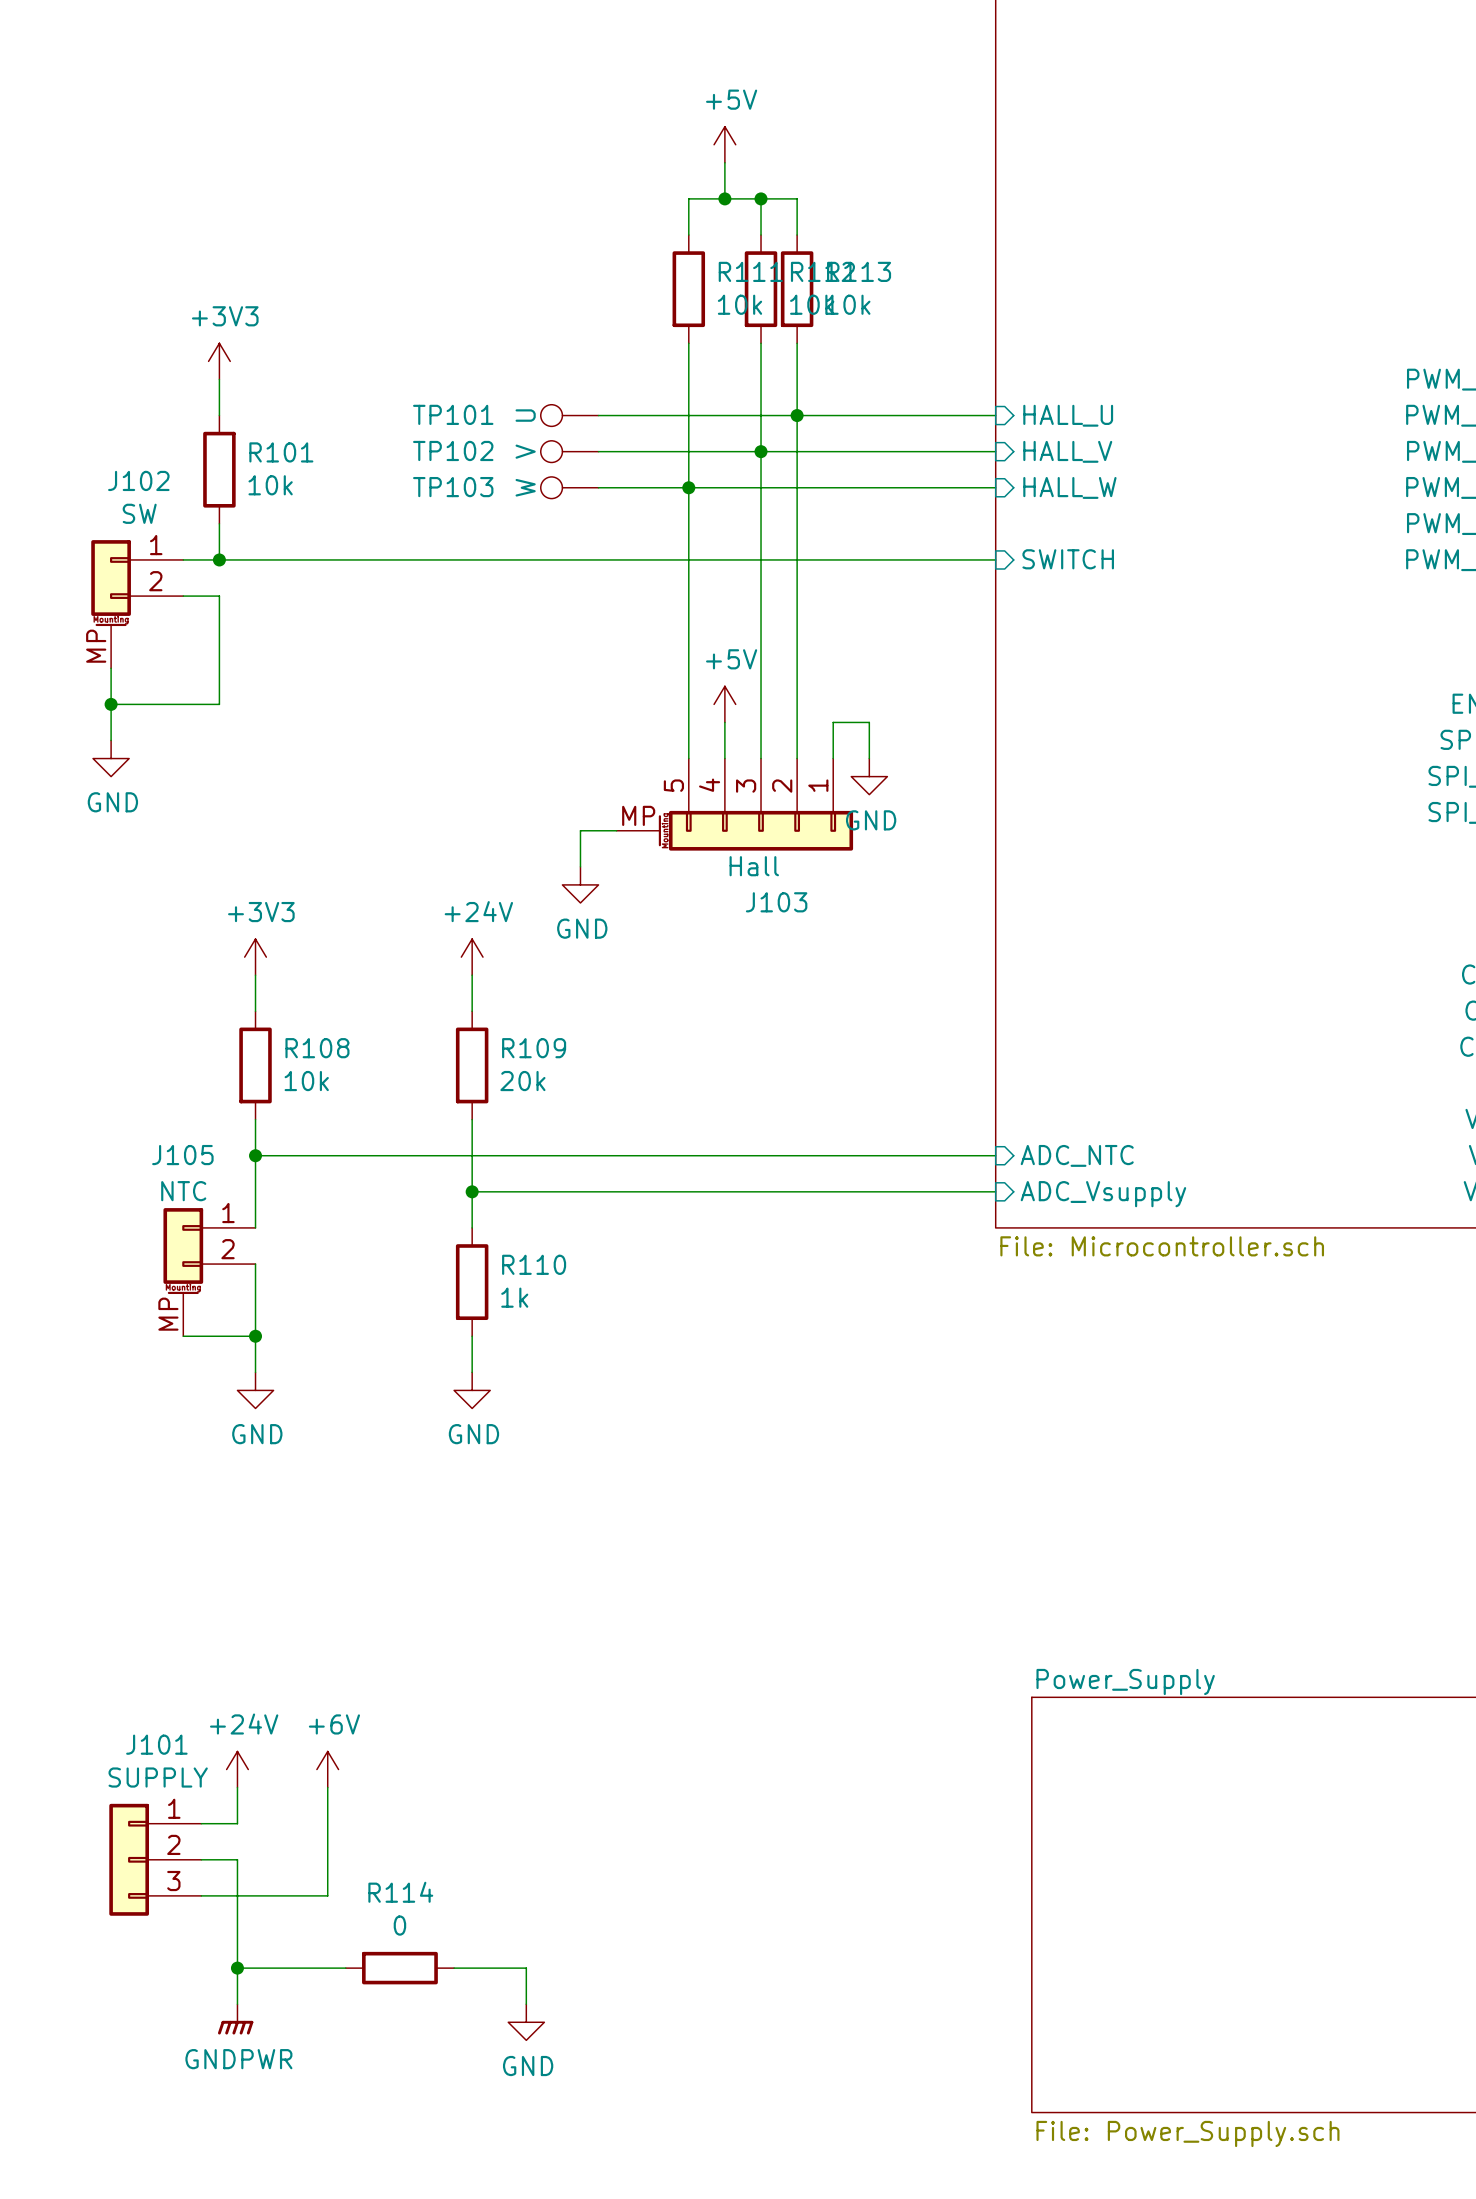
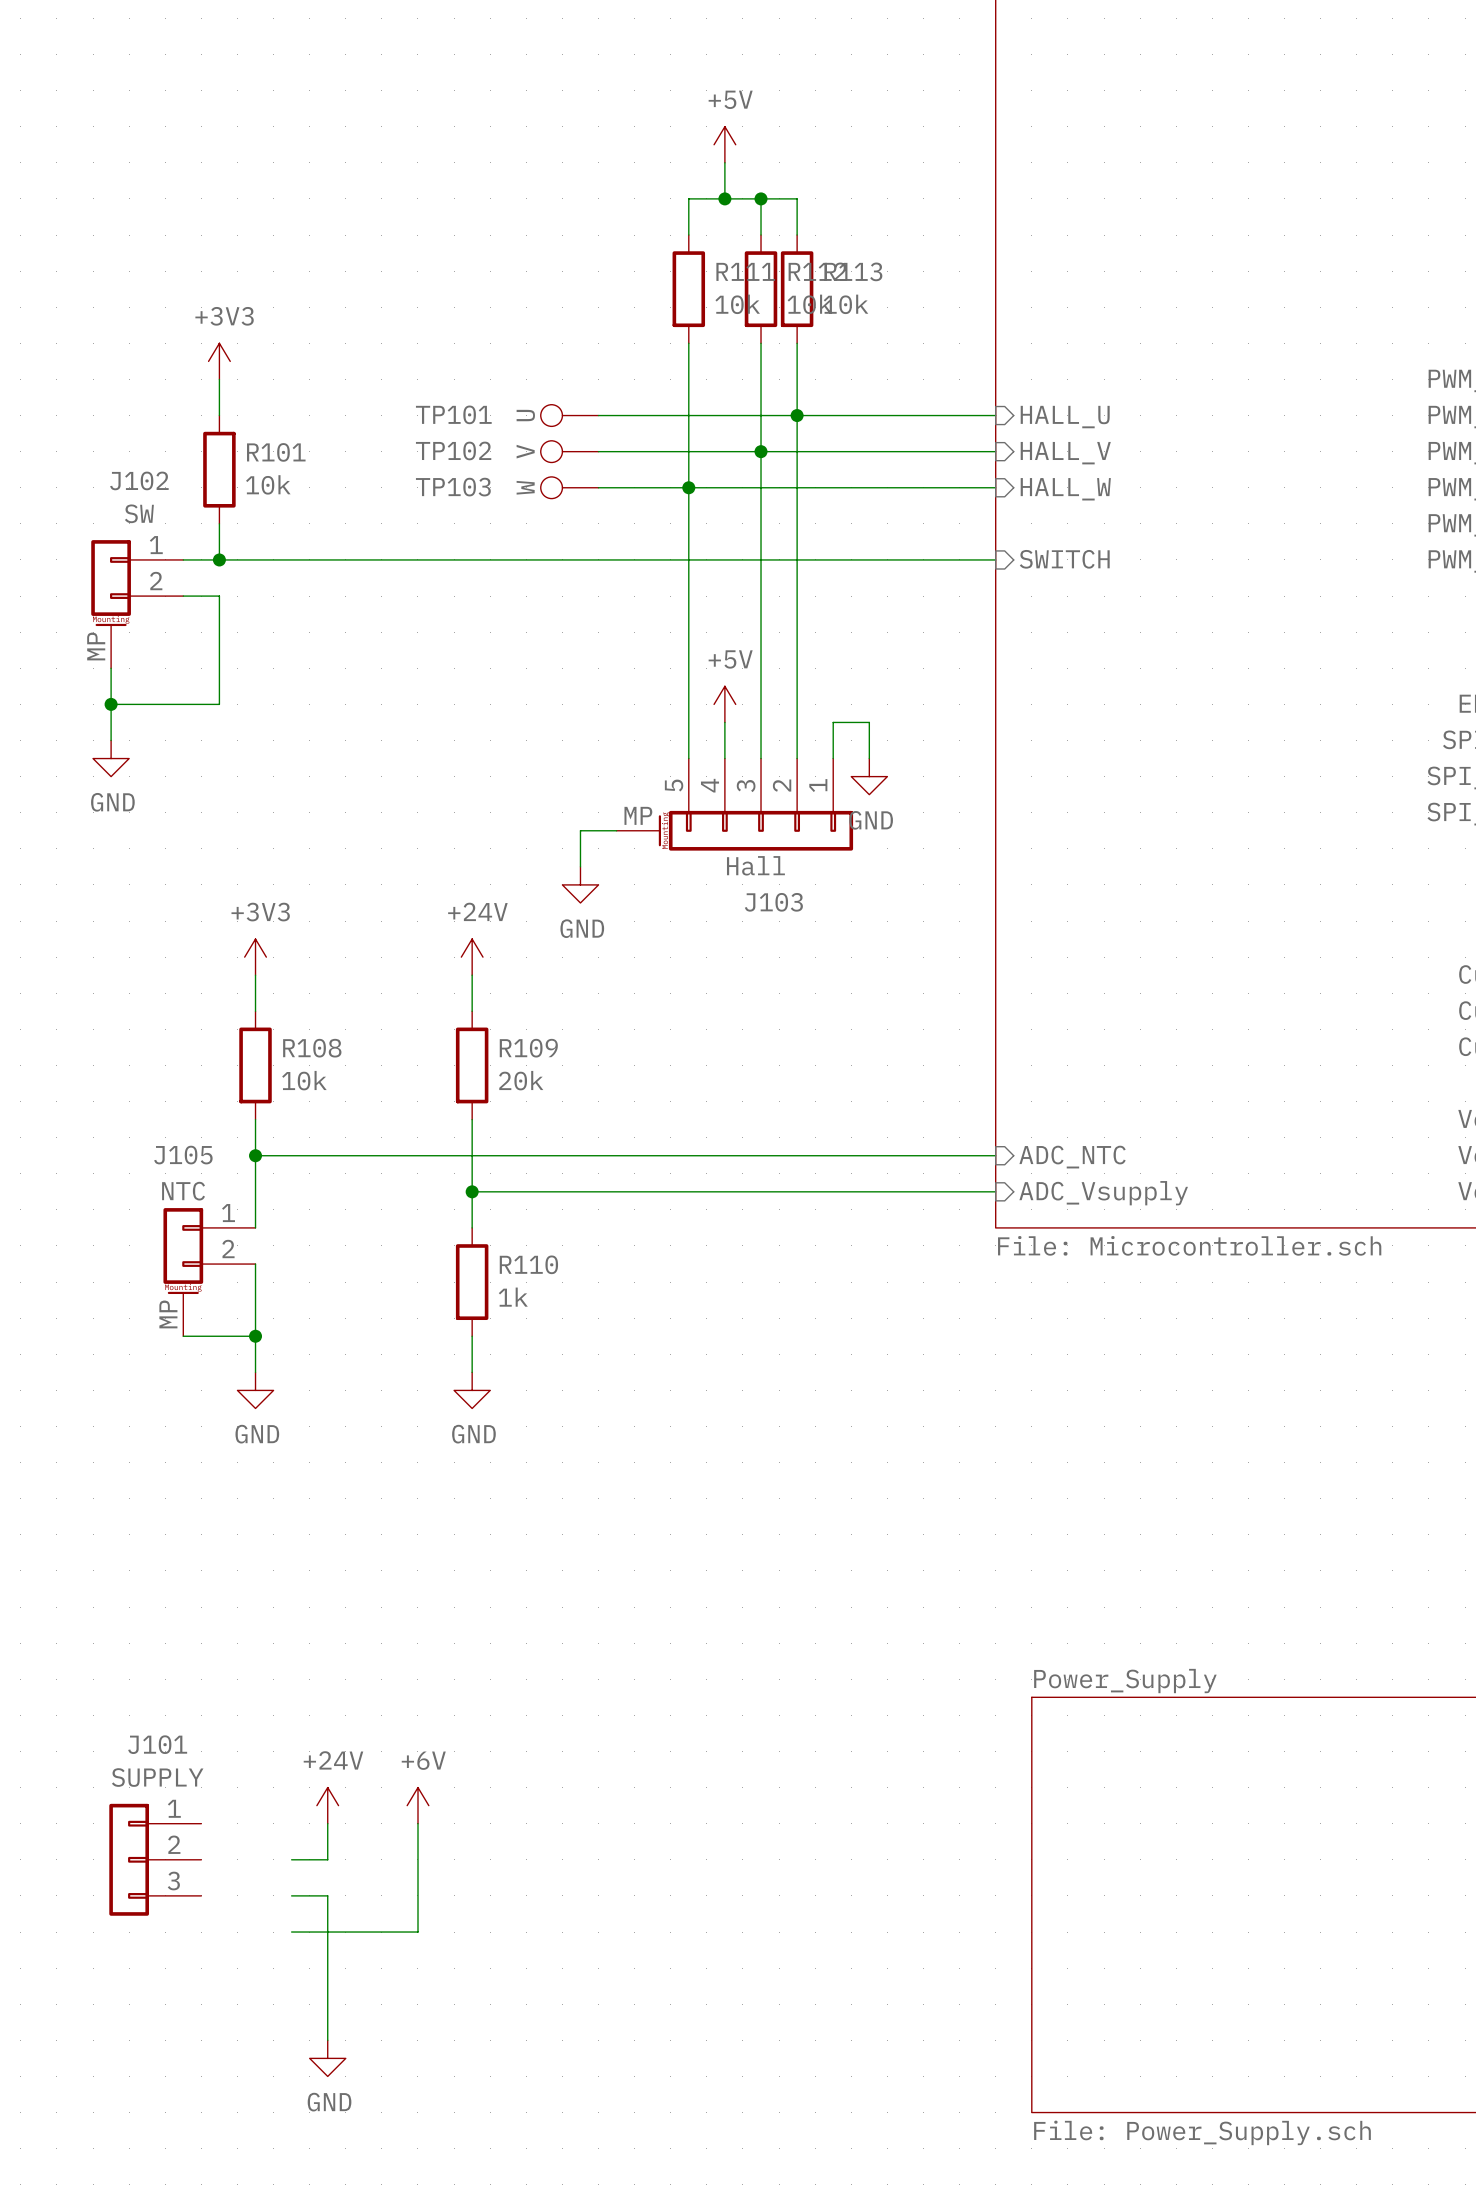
power symbol position: +24V (237, 1769) -> +24V (327, 1805)
power symbol position: +6V (327, 1769) -> +6V (417, 1805)
wire: (237, 1787) (237, 1823) (201, 1823) -> none
wire: none -> (417, 1823) (417, 1932) (291, 1932)
wire: (201, 1859) (237, 1859) (237, 2004) -> none
wire: (327, 1859) (327, 1895) -> (327, 1859) (291, 1859)
wire: (201, 1895) (291, 1895) -> none
wire: none -> (327, 1895) (327, 2040)
wire: (237, 1968) (345, 1968) -> none
junction: (237, 1968) -> none
R114: 0 (399, 1968) -> none
wire: (454, 1968) (526, 1968) (526, 2004) -> none
power symbol: GNDPWR (235, 2019) -> none
power symbol position: GND (526, 2022) -> GND (327, 2058)

